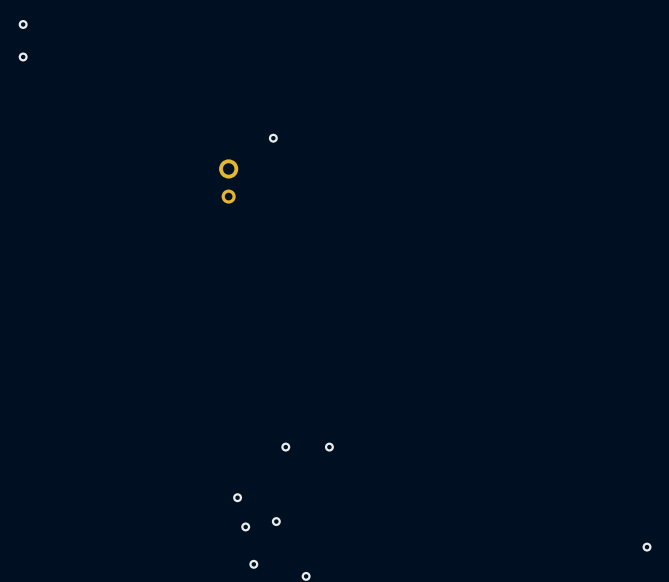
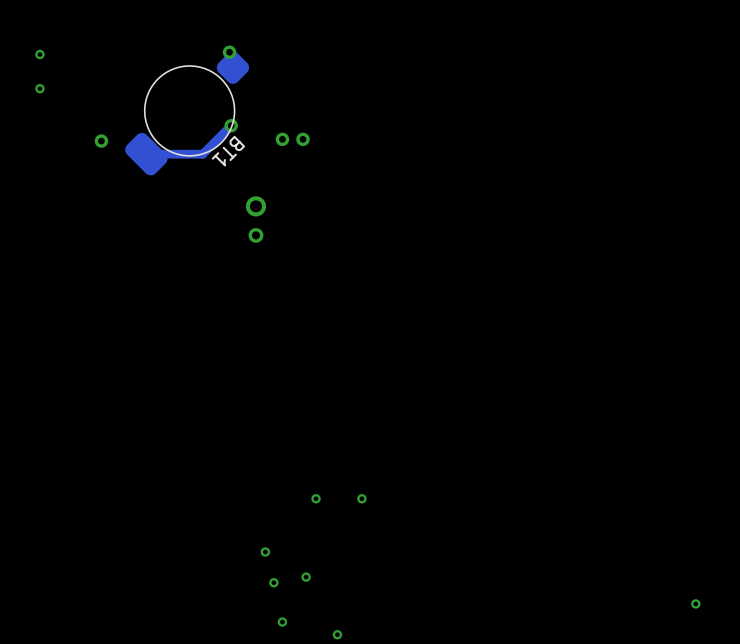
via: none -> (229, 52)
BT1: none -> (187, 113)
track: none -> (231, 125) (202, 154) (146, 154)
via: none -> (231, 125)
via: none -> (282, 139)
via: none -> (302, 139)
via: none -> (101, 141)
via: (273, 138) -> none

